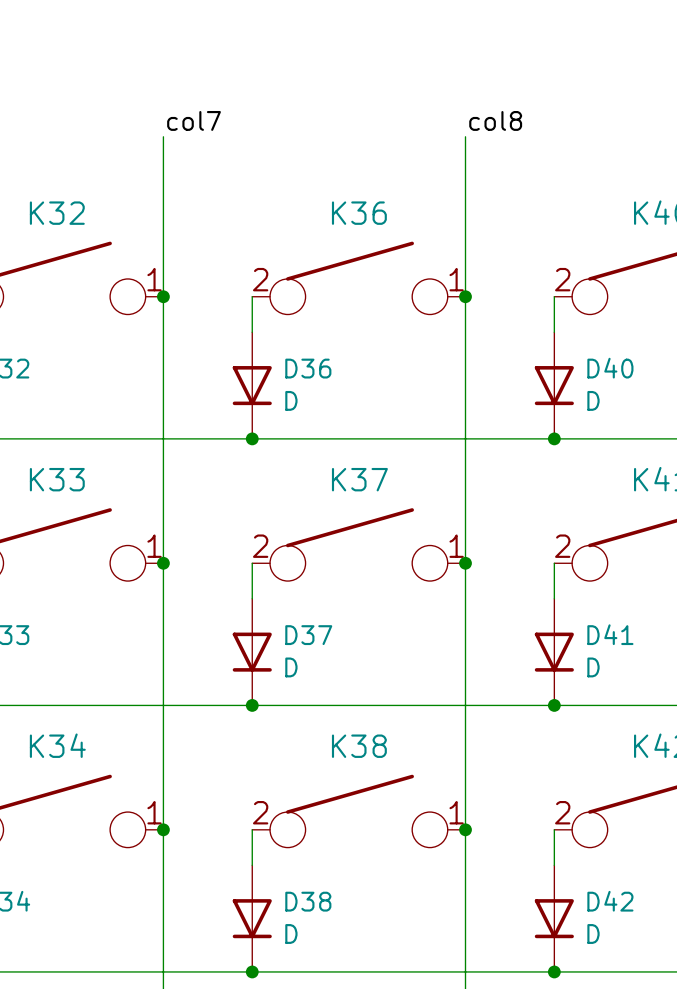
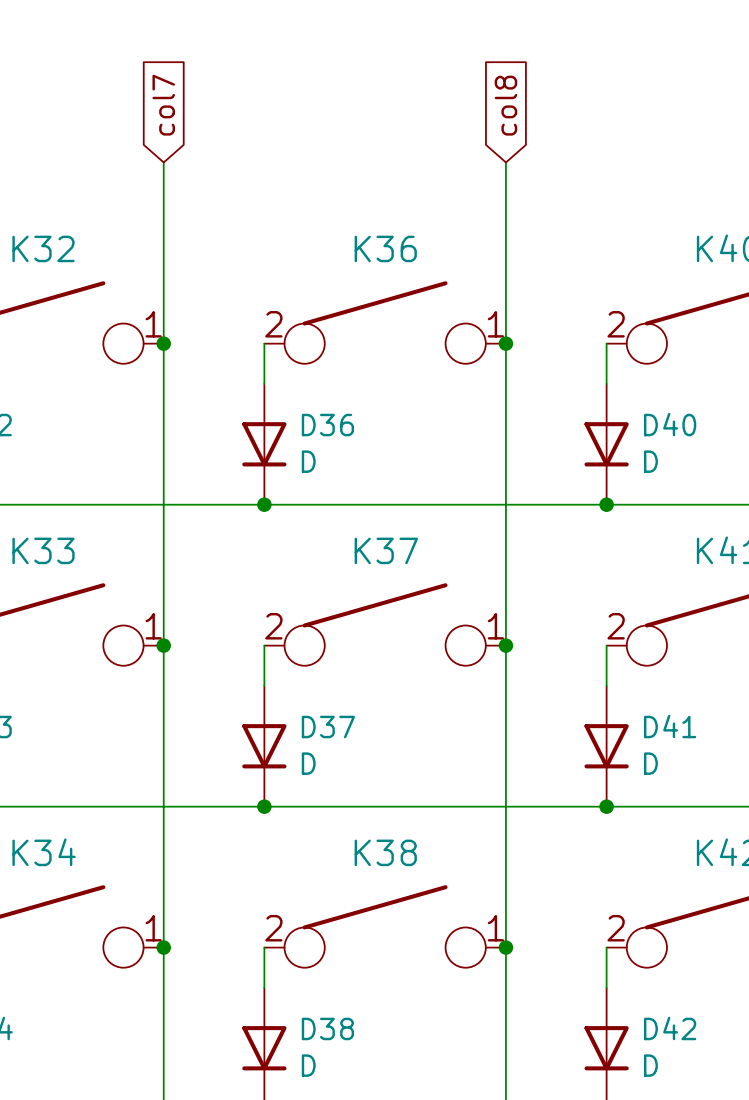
global label: none -> col7 (163, 105)
global label: none -> col8 (505, 105)
label: col7 (194, 120) -> none
label: col8 (495, 120) -> none

